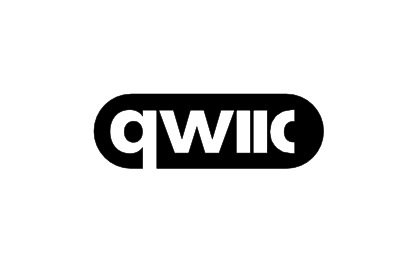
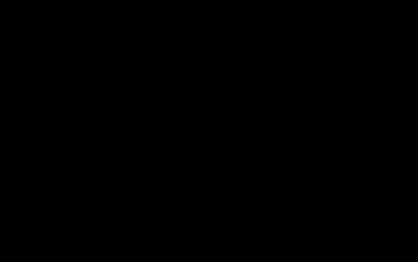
drawing: [93, 93, 324, 169] -> none

